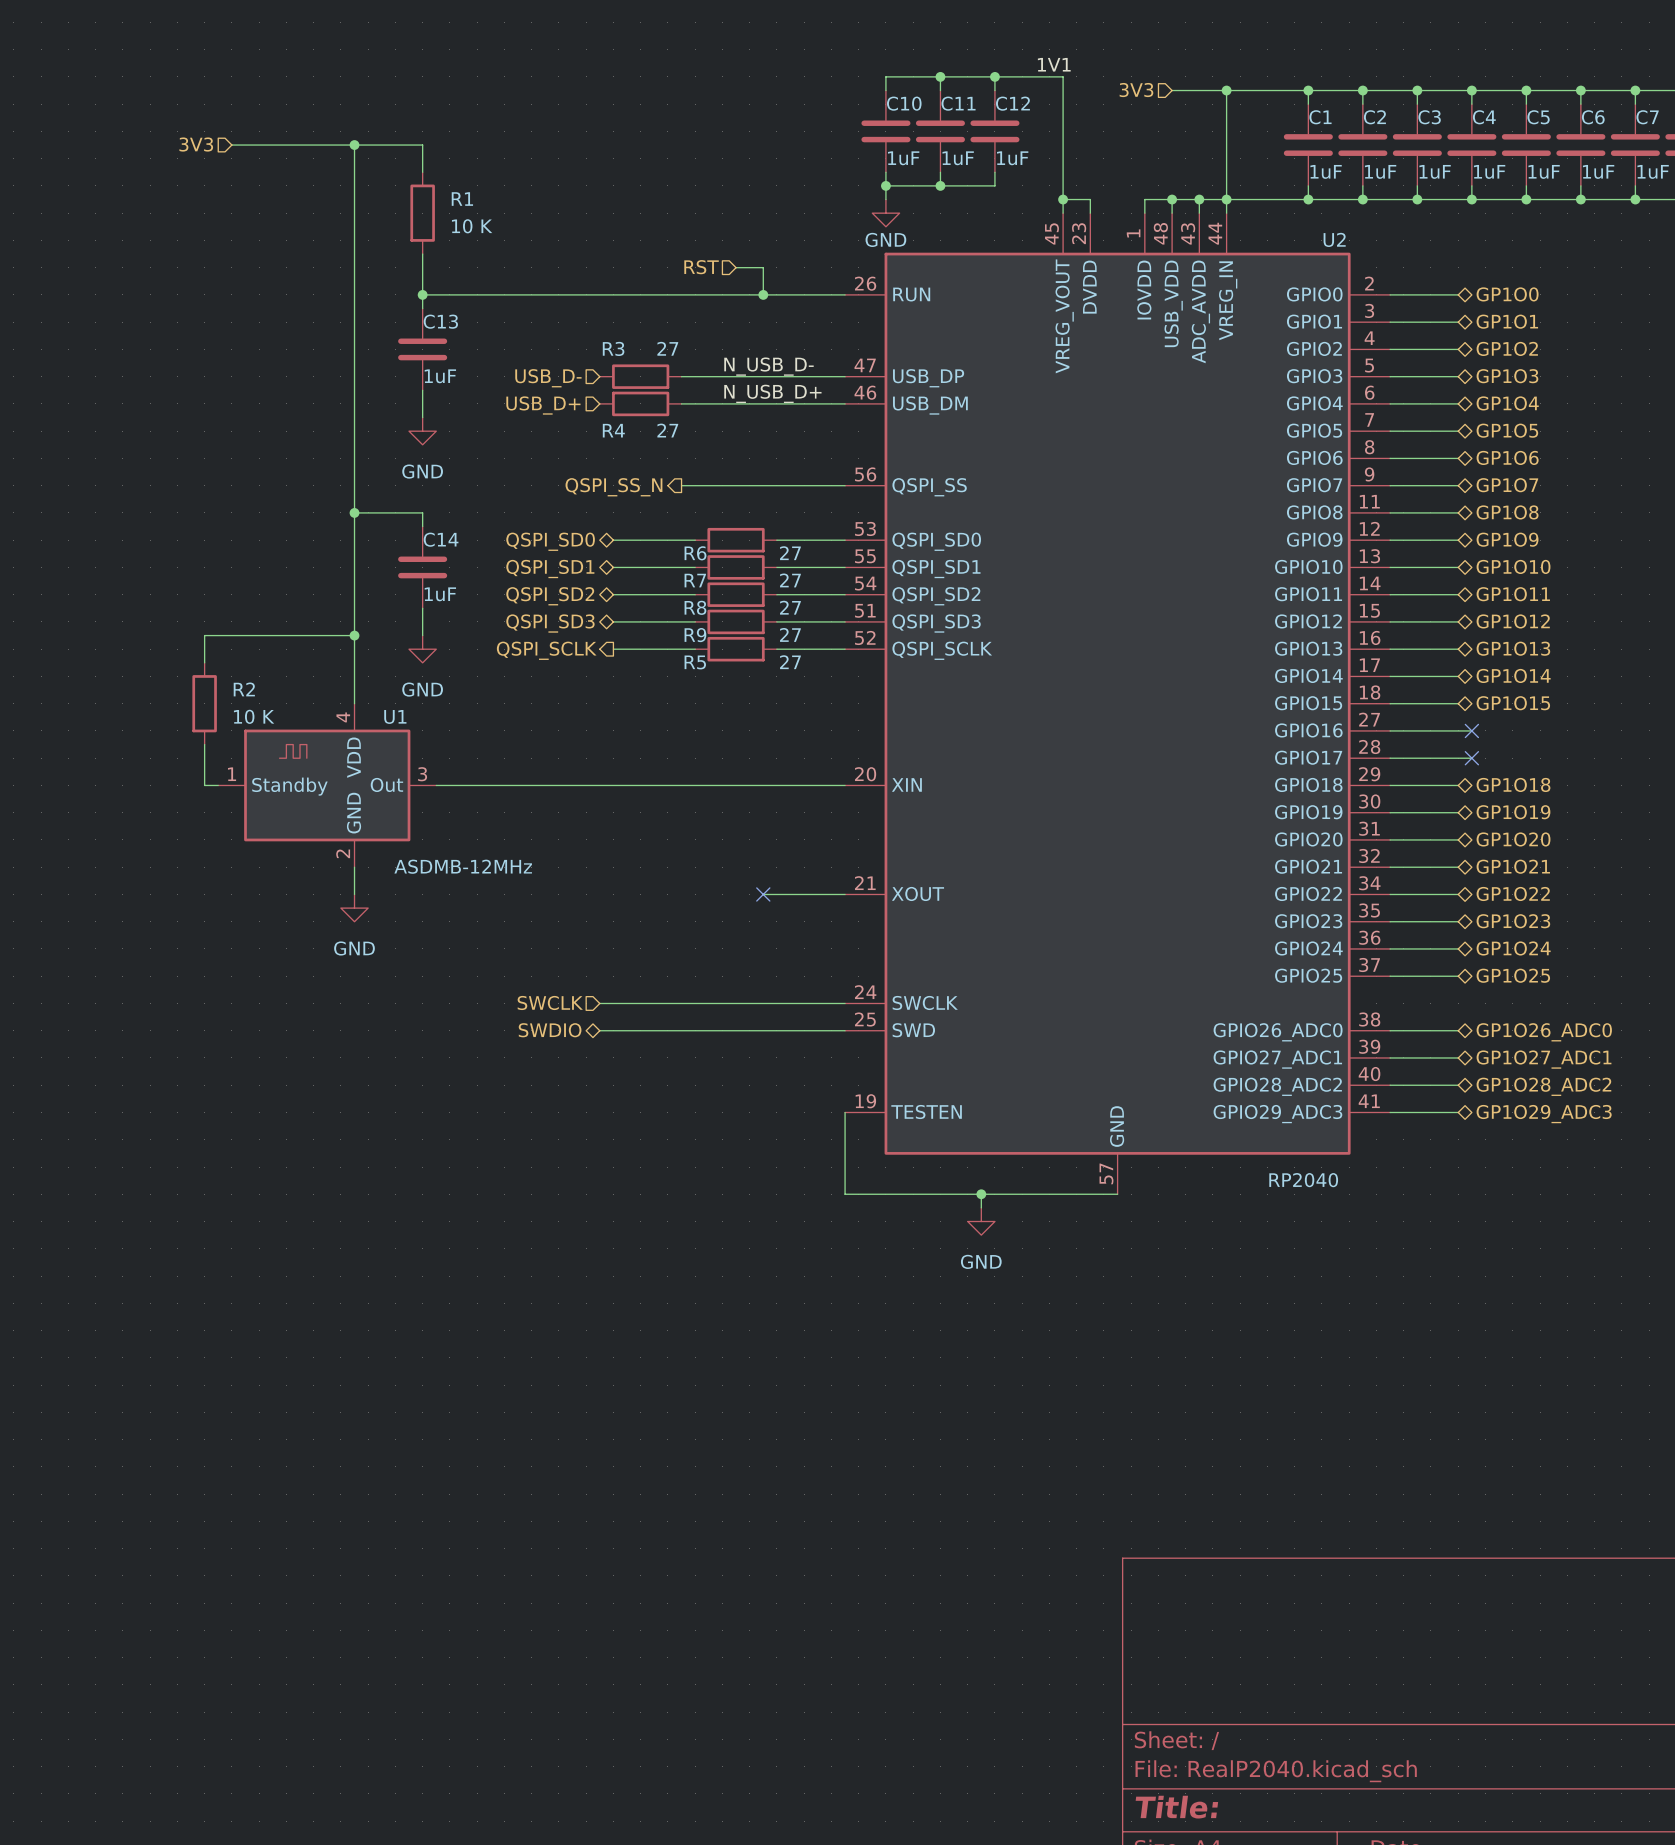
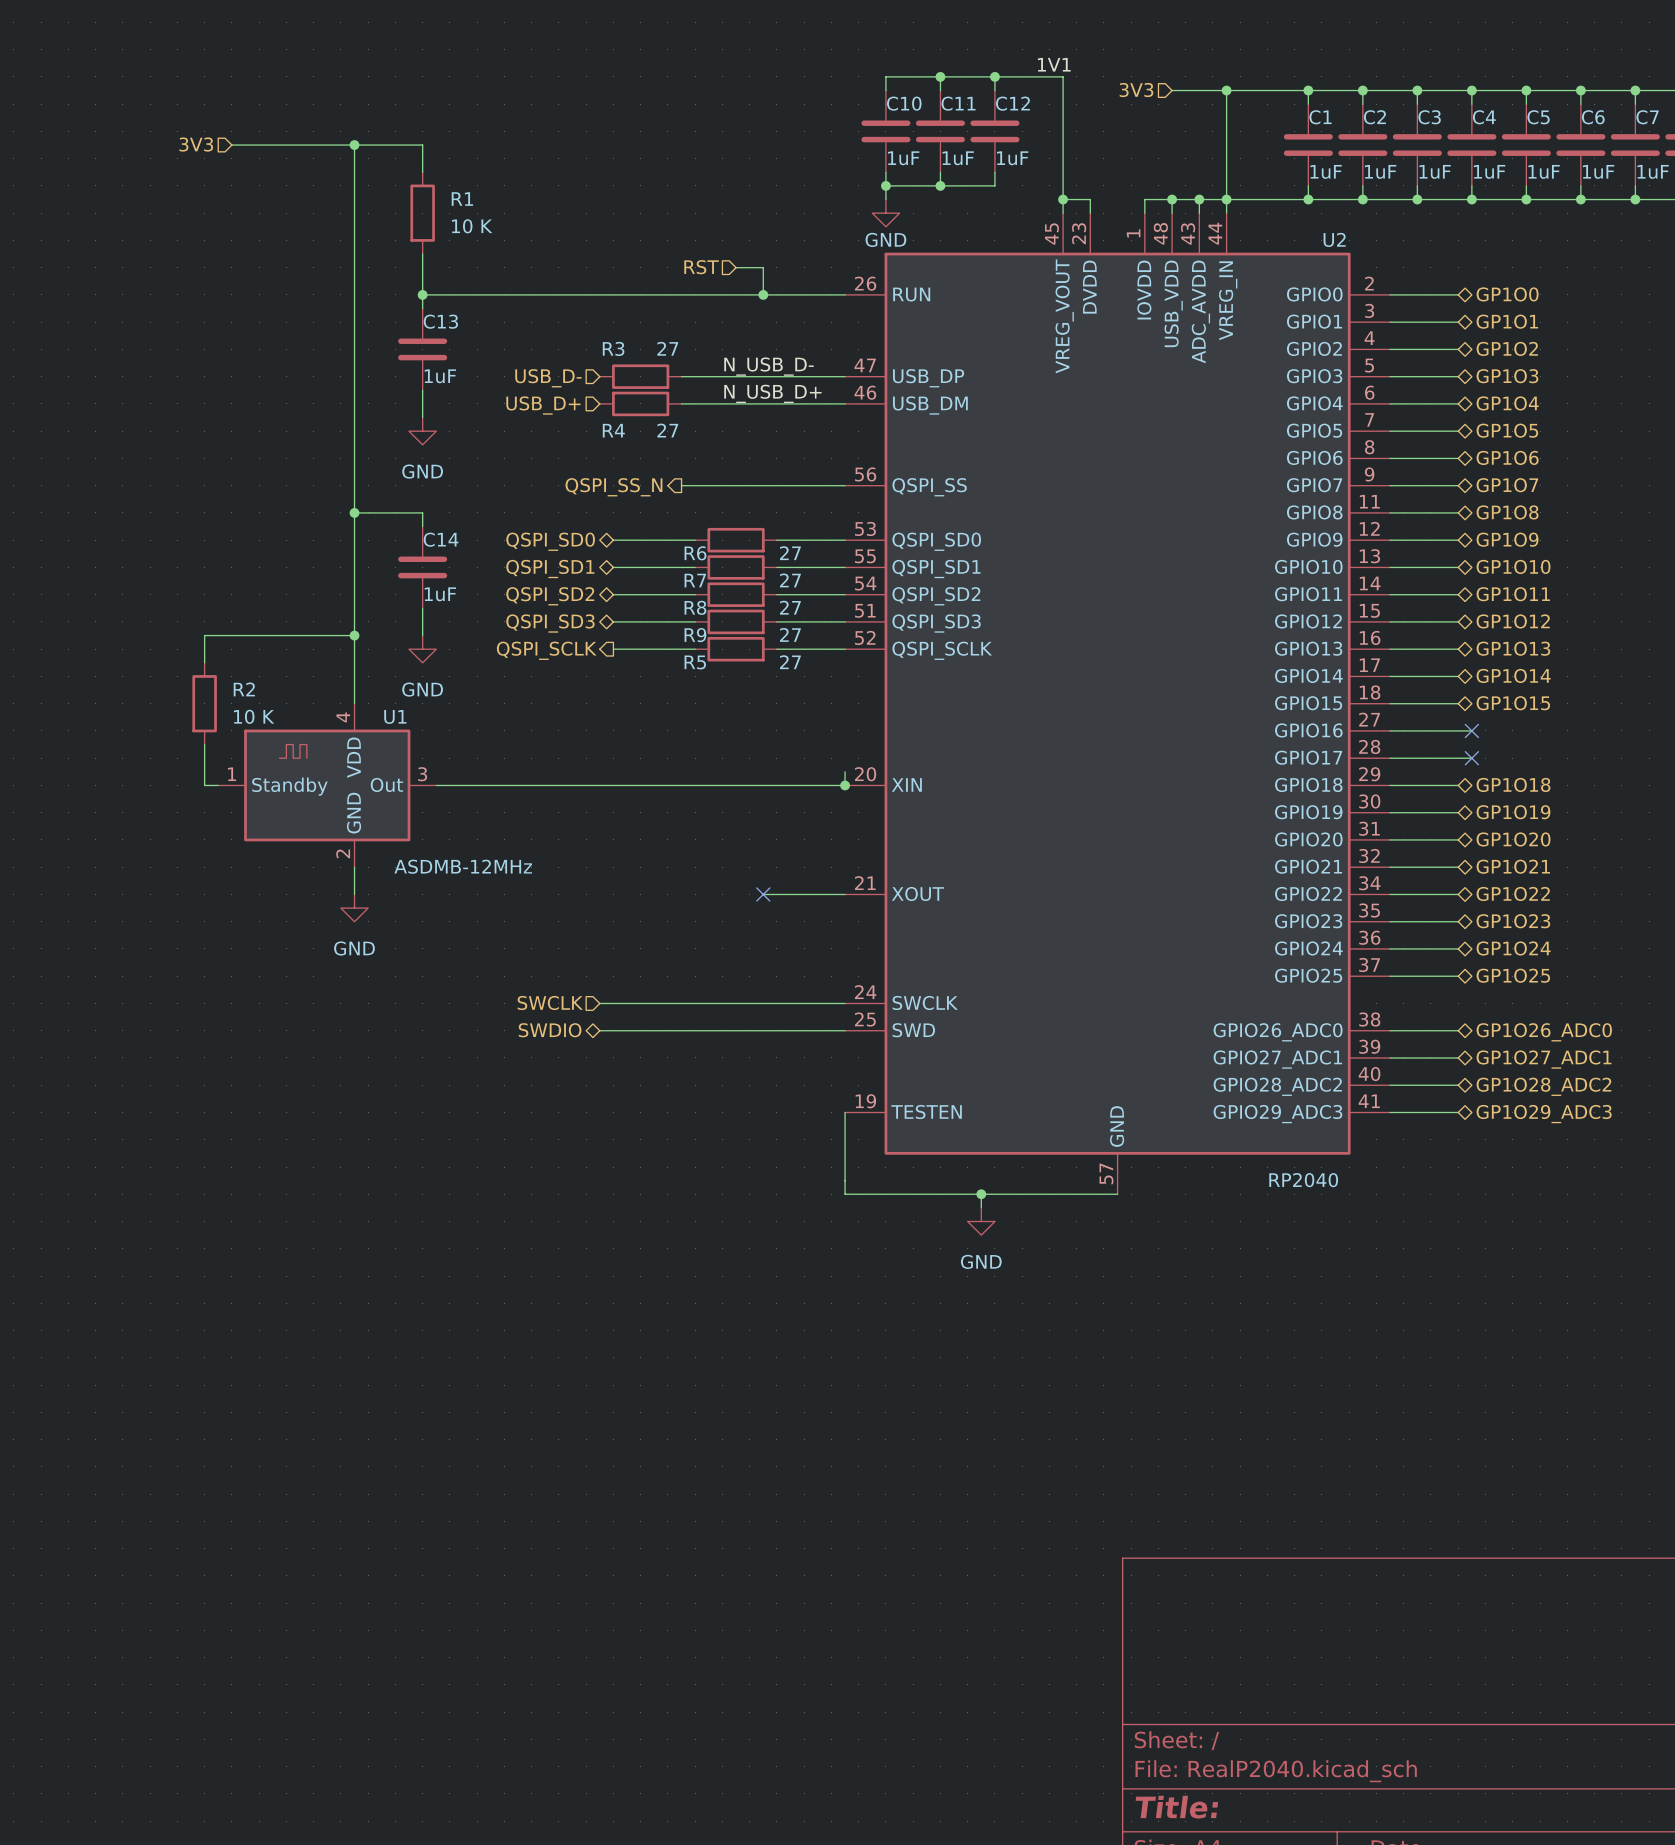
wire: none -> (845, 771) (845, 785)
junction: none -> (845, 785)

